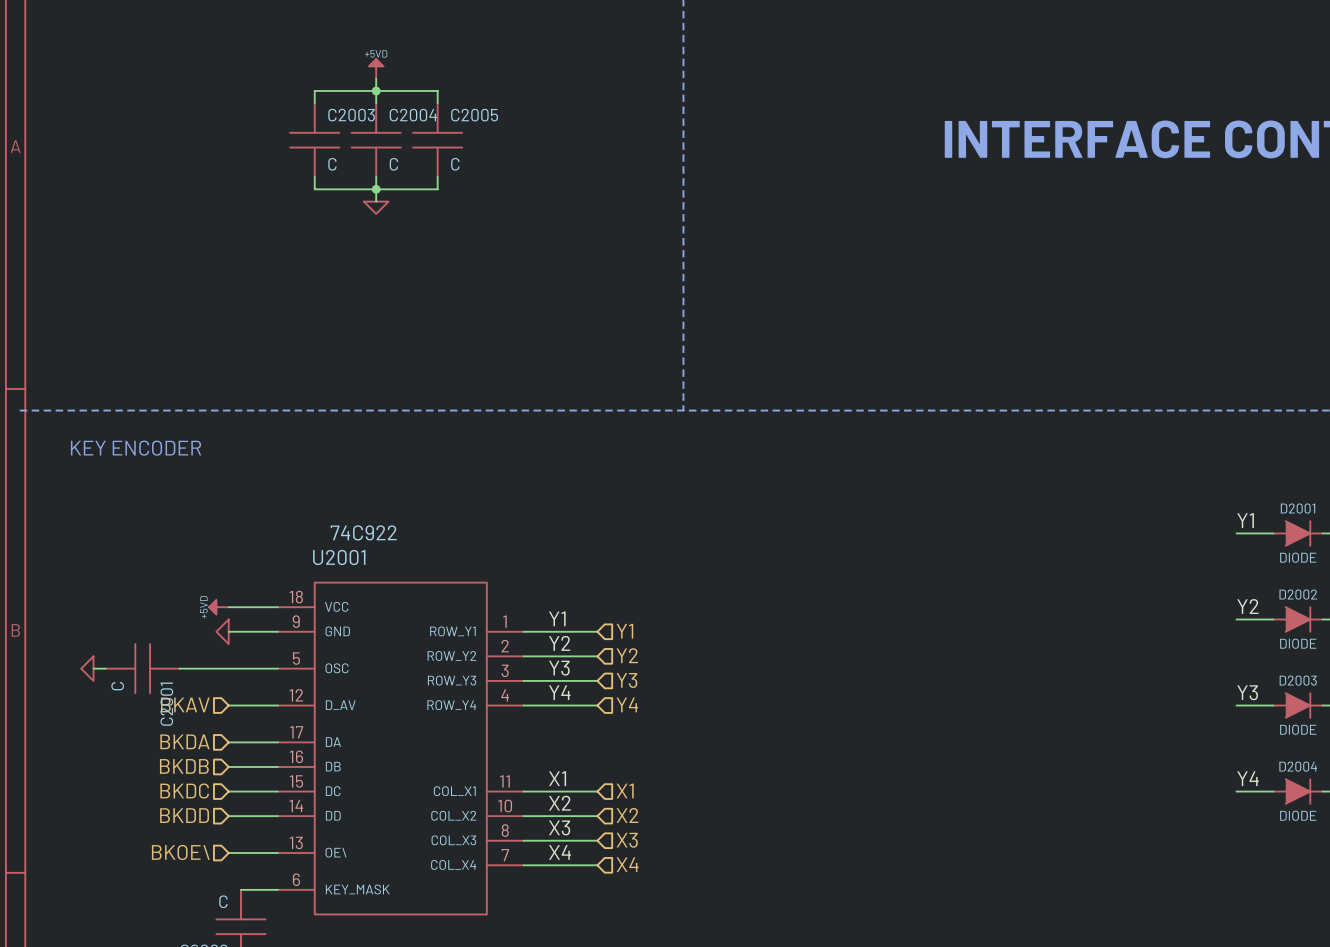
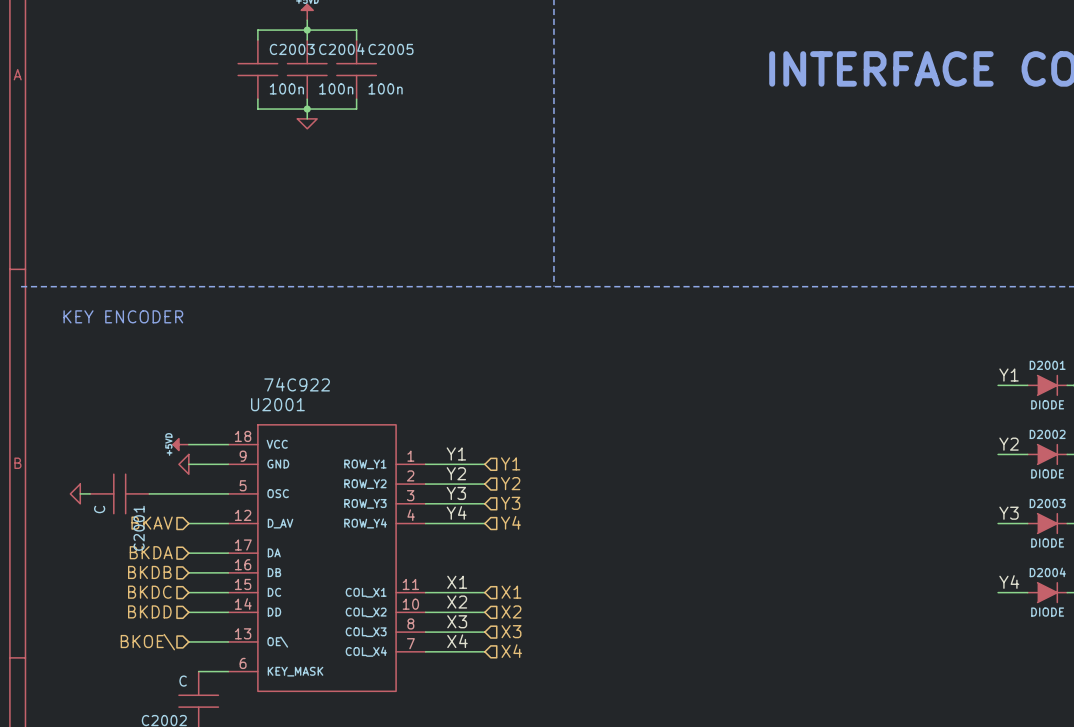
C2003 value: C (332, 164) -> 100n (286, 88)
C2004 value: C (393, 164) -> 100n (336, 88)
C2005 value: C (455, 164) -> 100n (385, 88)

